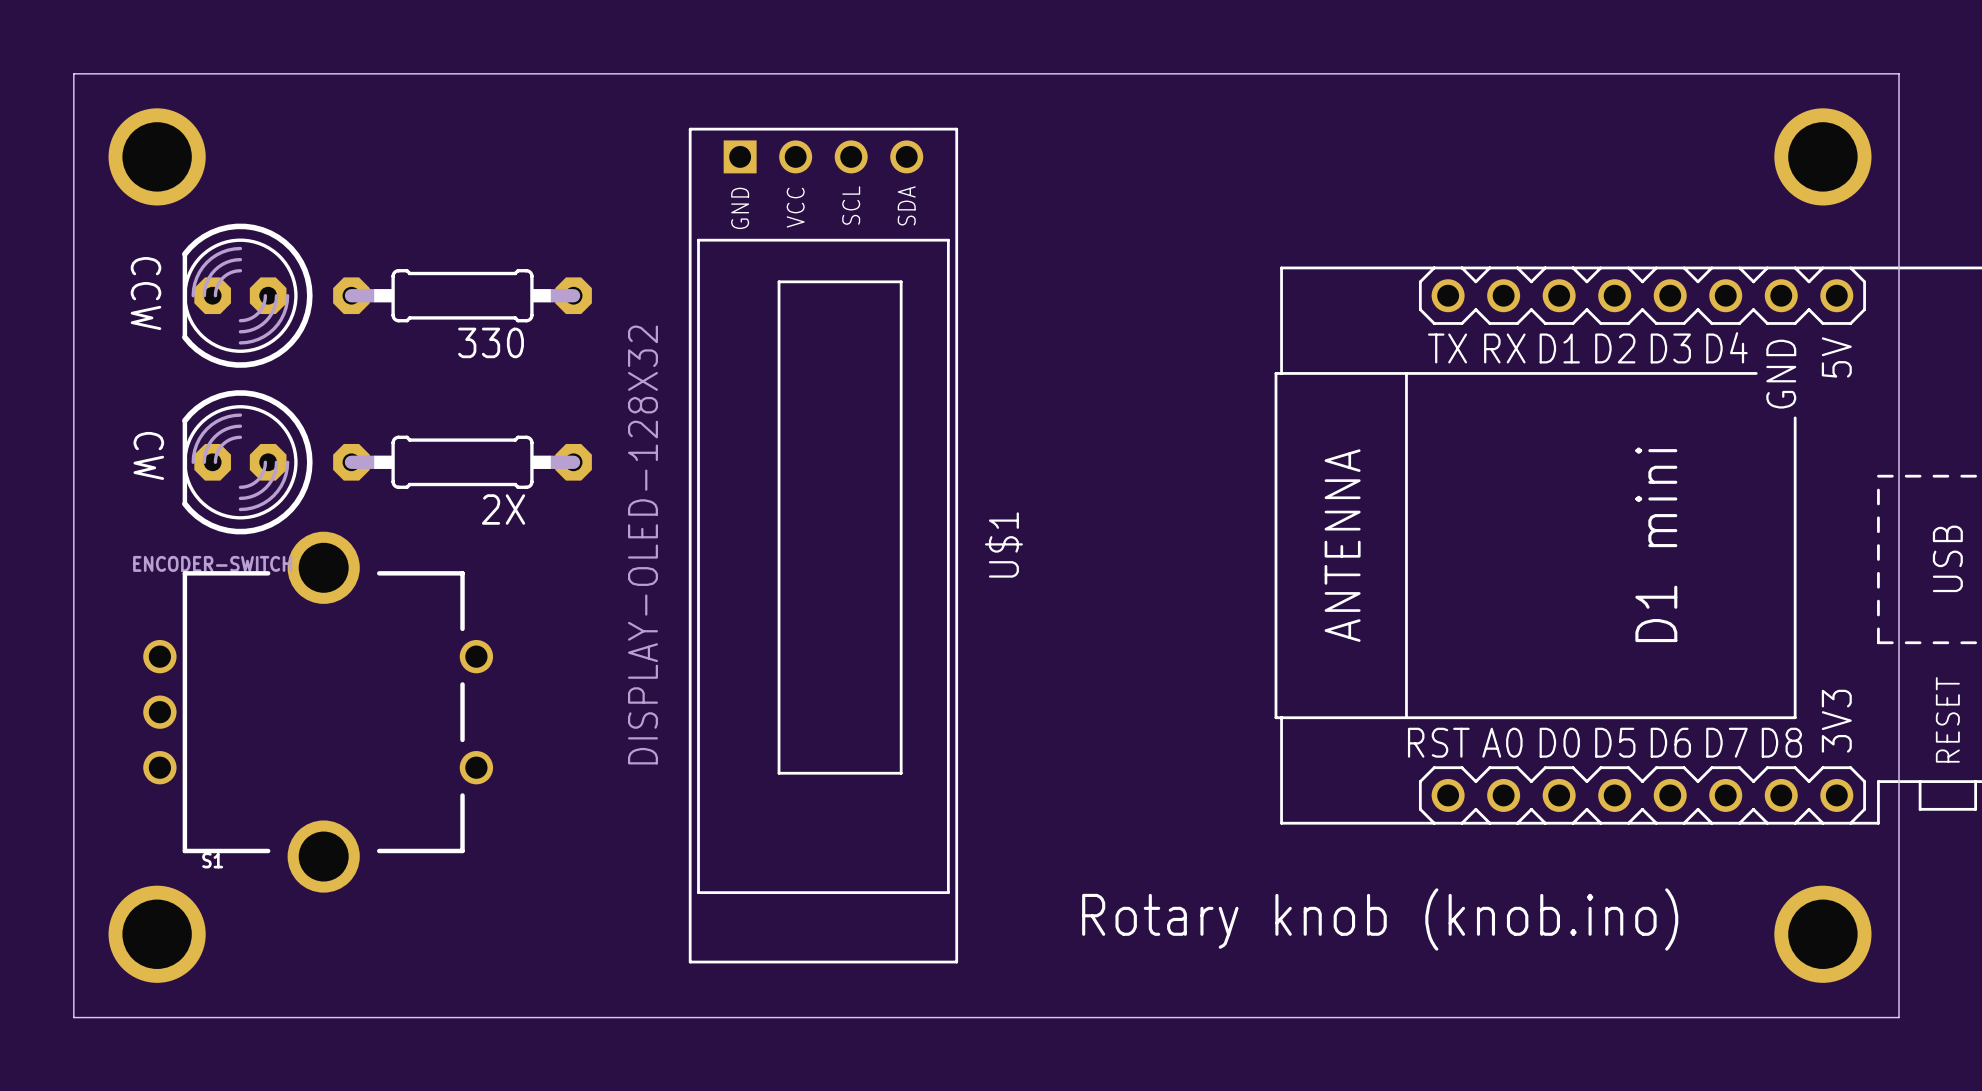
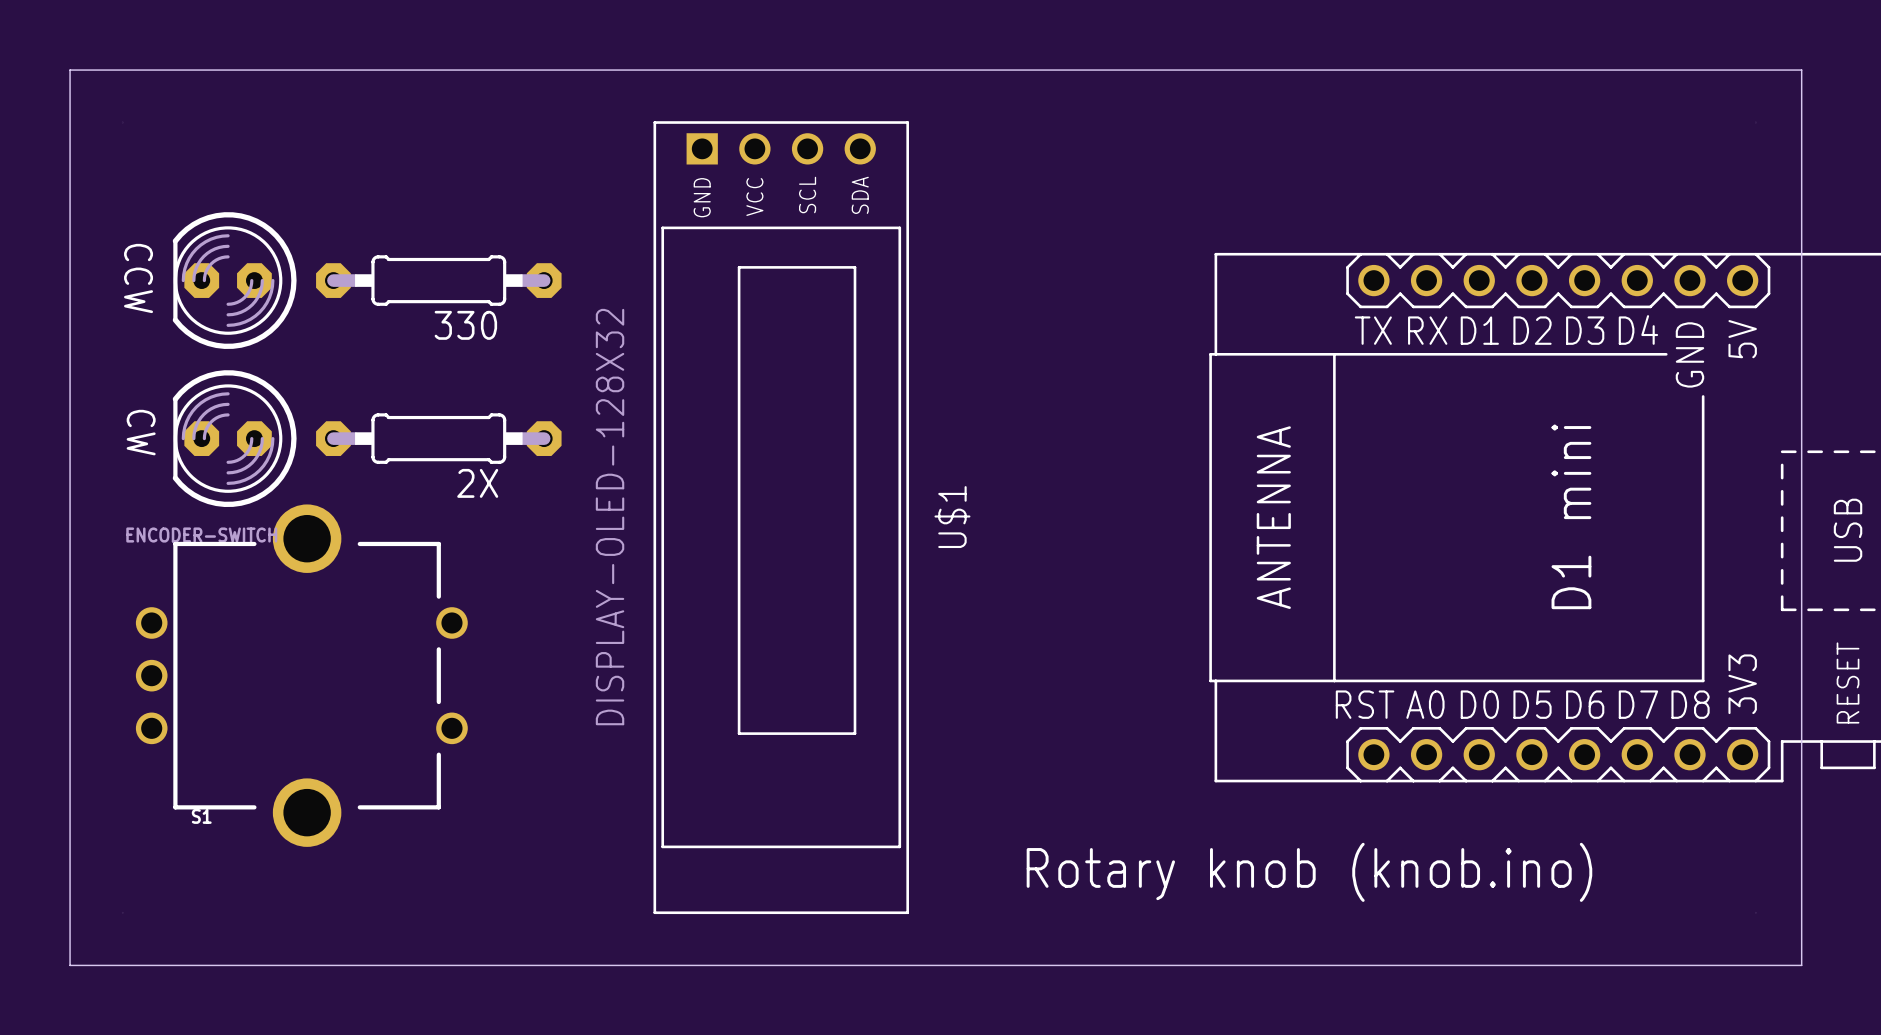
part: (157, 156) -> none
part: (1822, 156) -> none
part: (157, 934) -> none
part: (1822, 934) -> none

